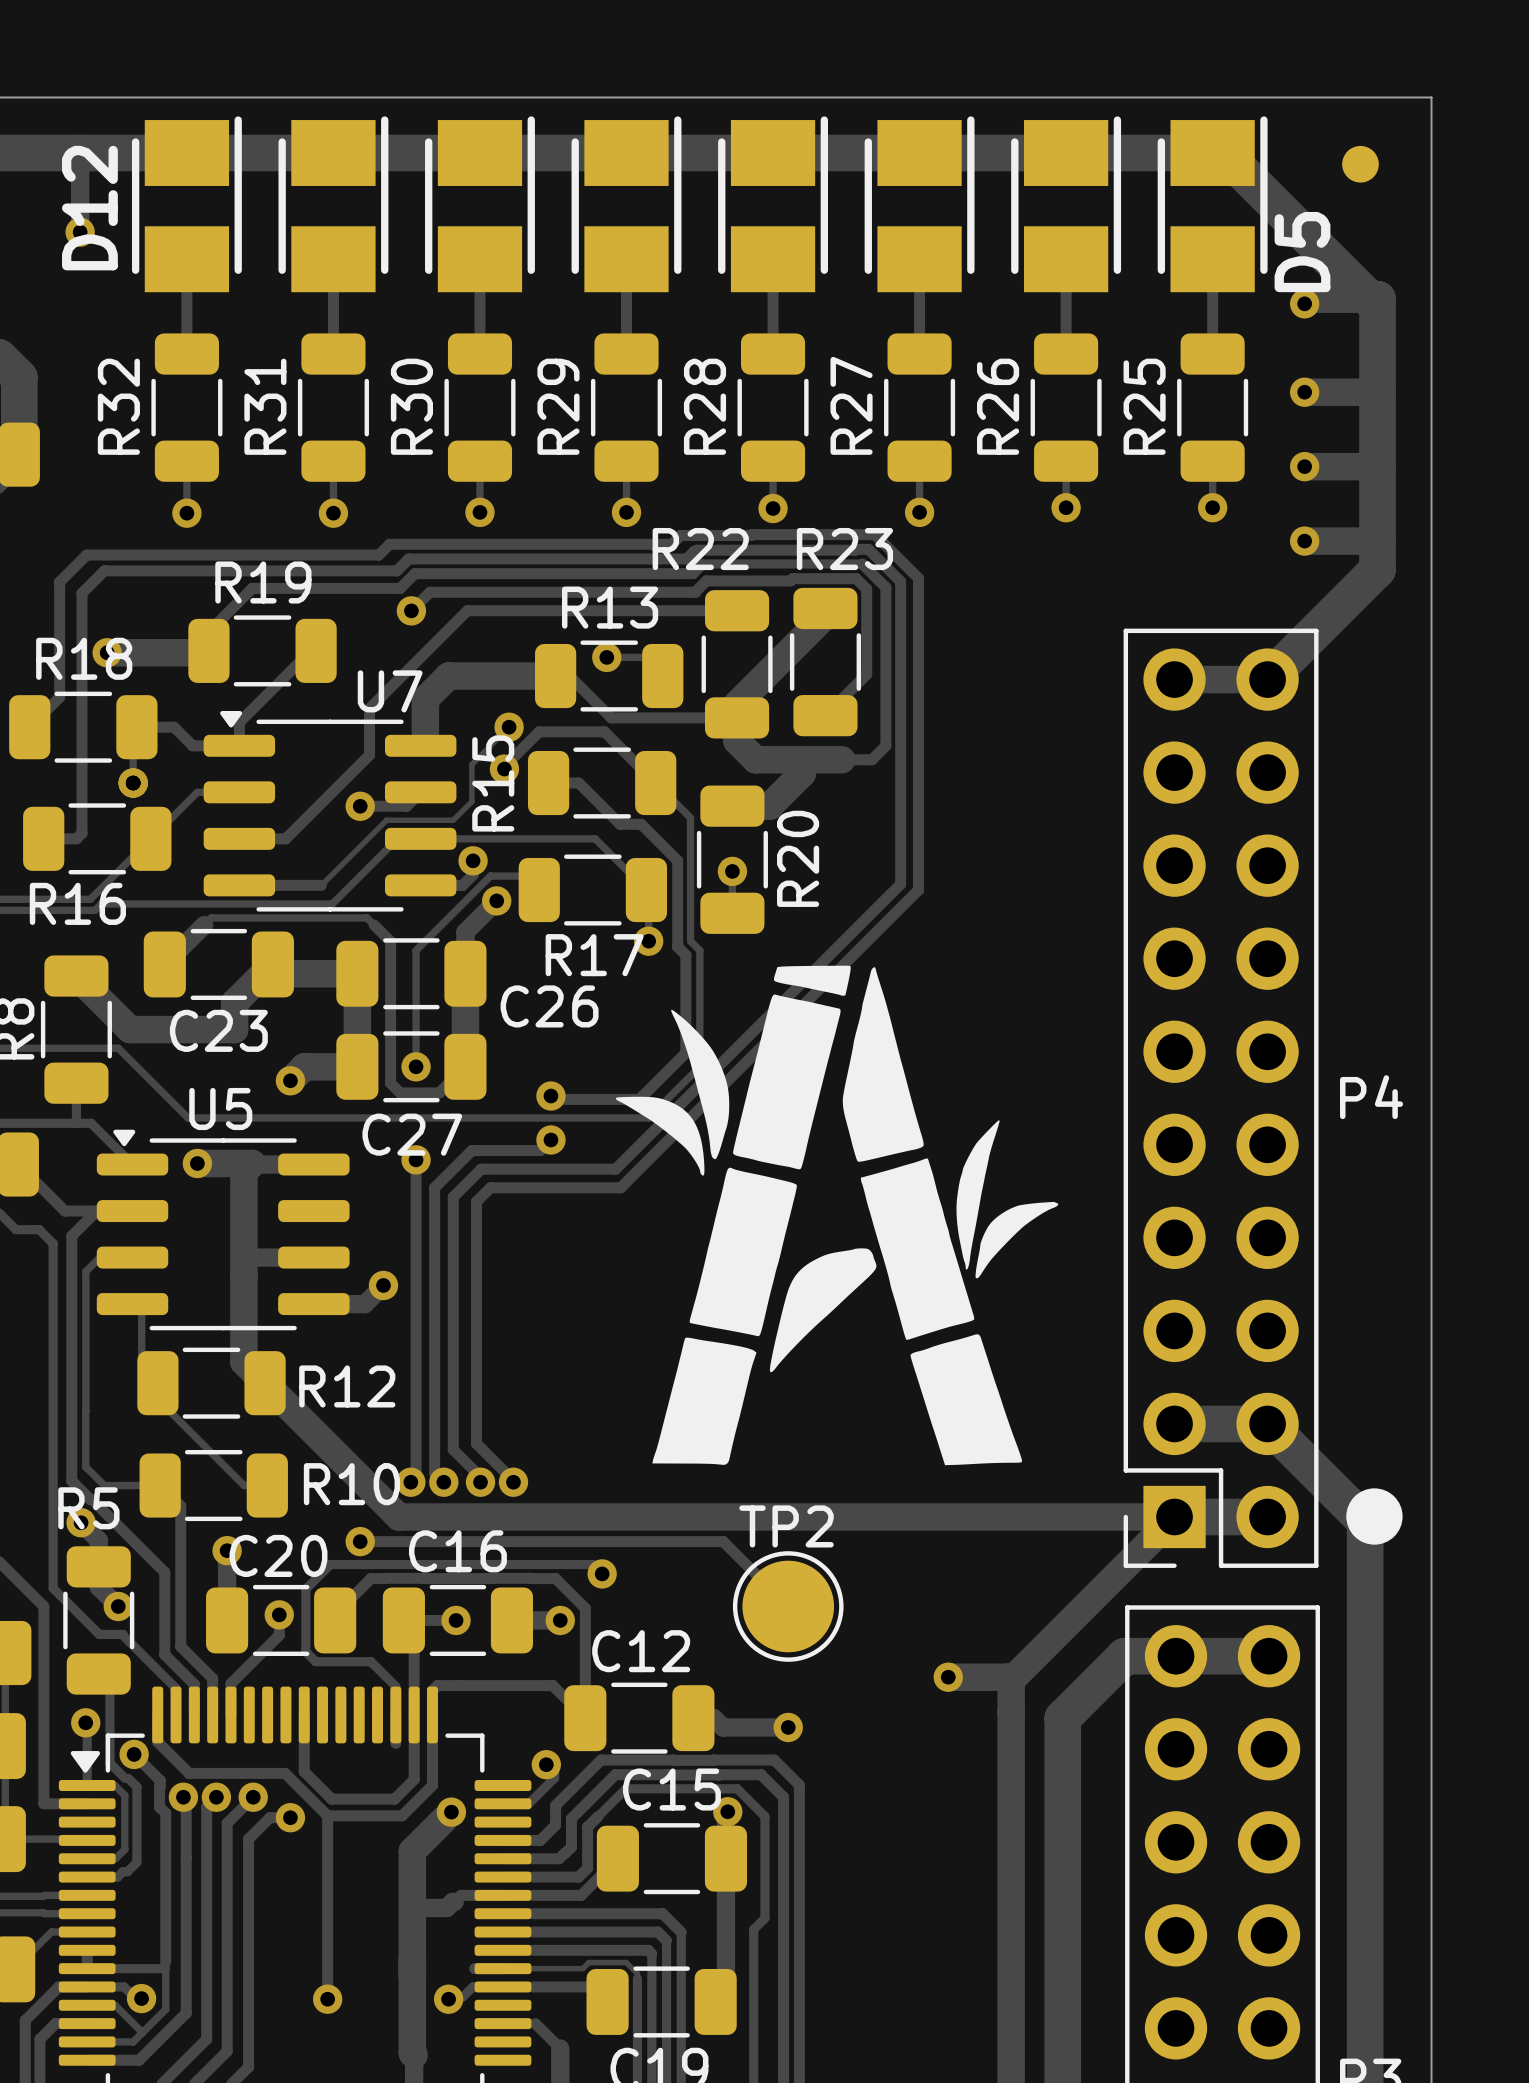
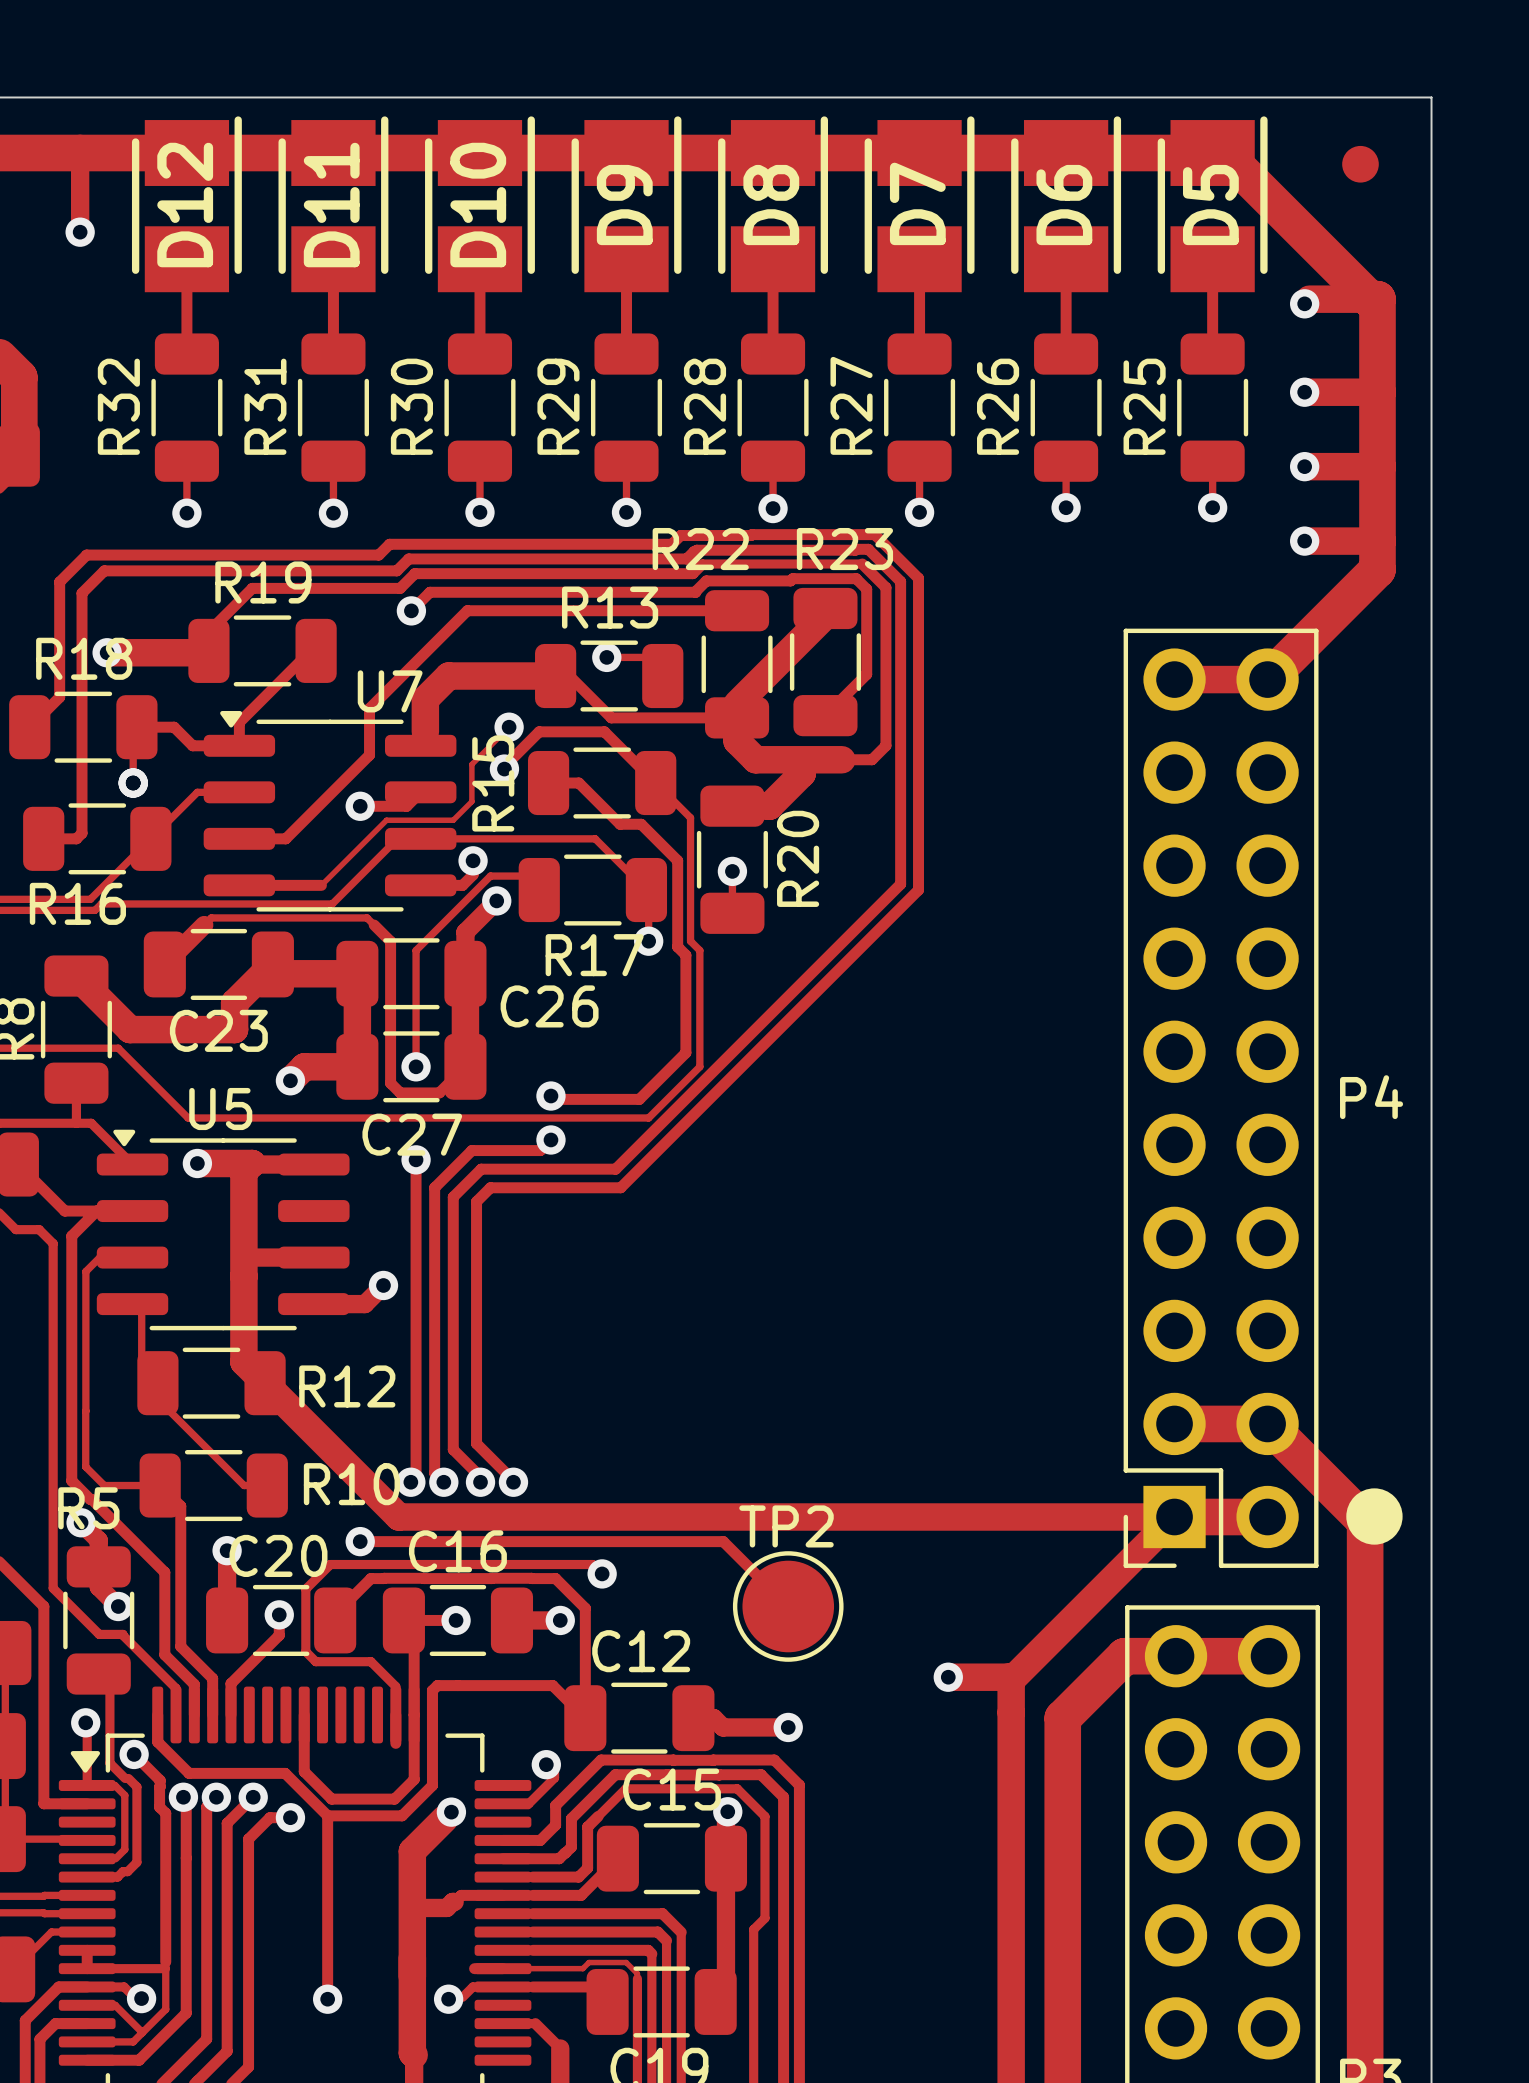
D7 name: none -> D7 (917, 203)
D11 name: none -> D11 (331, 205)
D10 name: none -> D10 (478, 205)
D9 name: none -> D9 (624, 205)
D8 name: none -> D8 (771, 205)
D6 name: none -> D6 (1064, 205)
D12 name position: D12 (89, 208) -> D12 (185, 205)
D5 name position: D5 (1302, 252) -> D5 (1210, 205)
drawing: [615, 965, 1059, 1466] -> none

